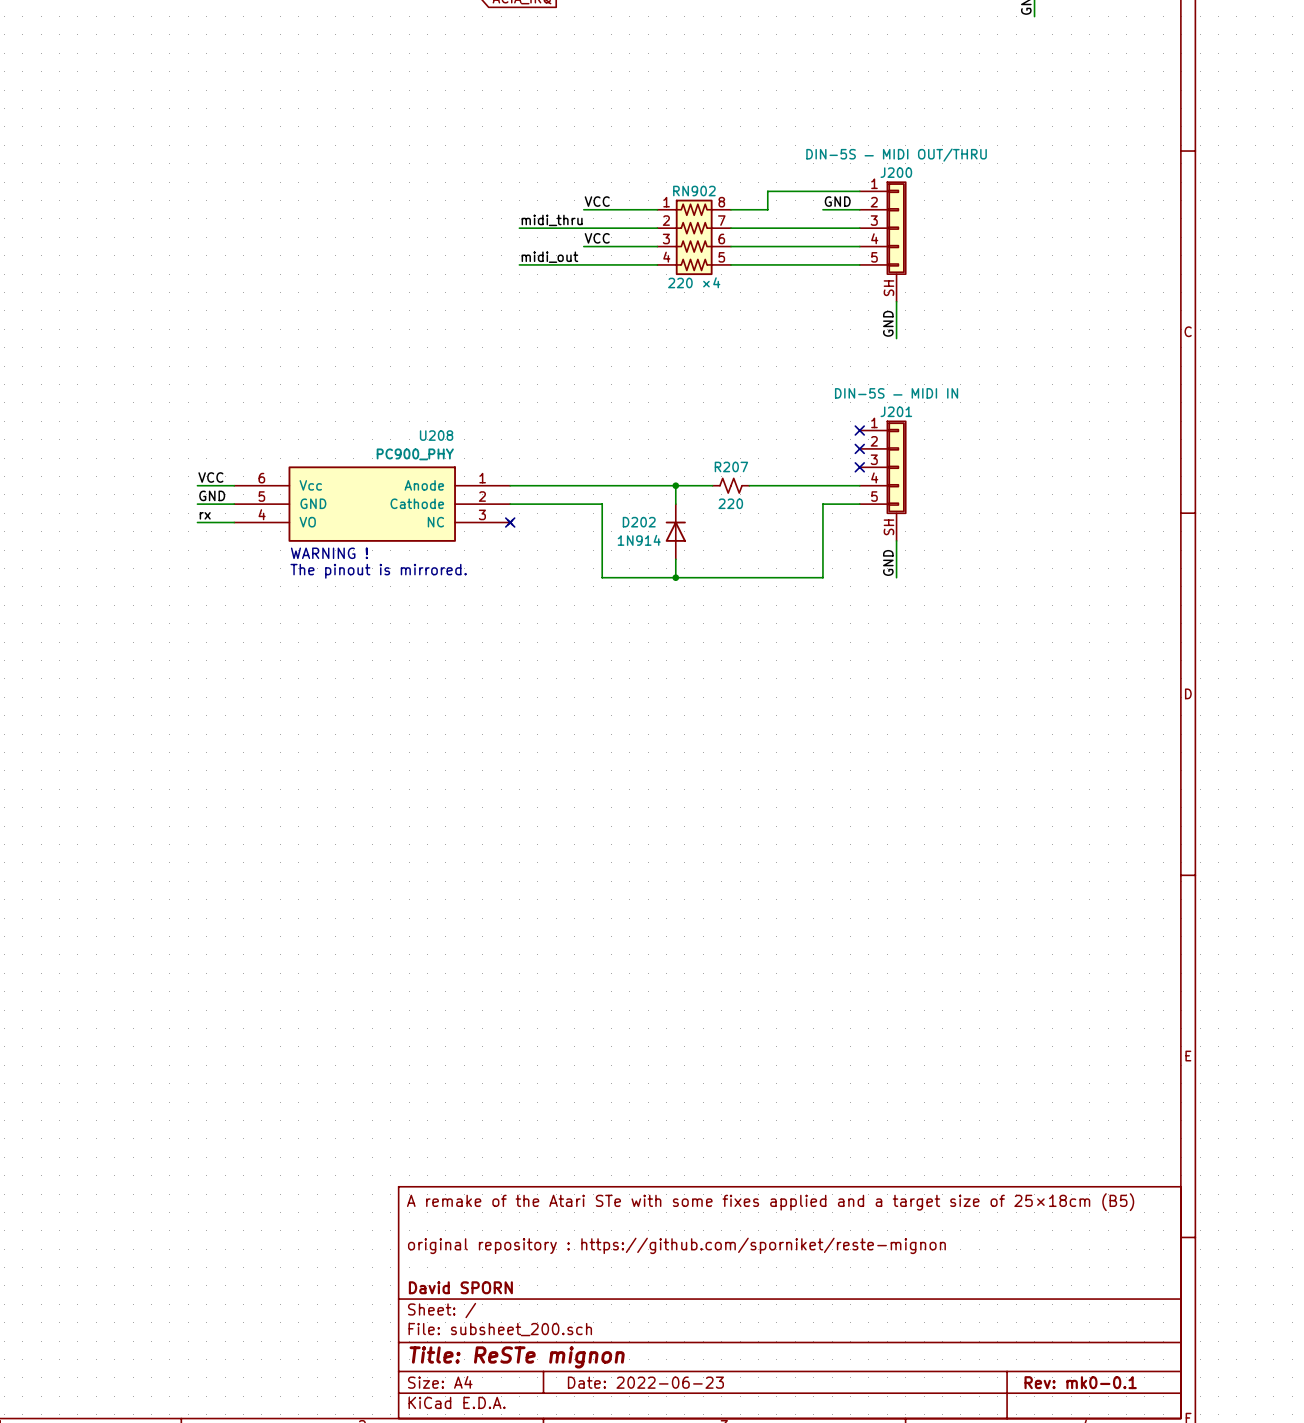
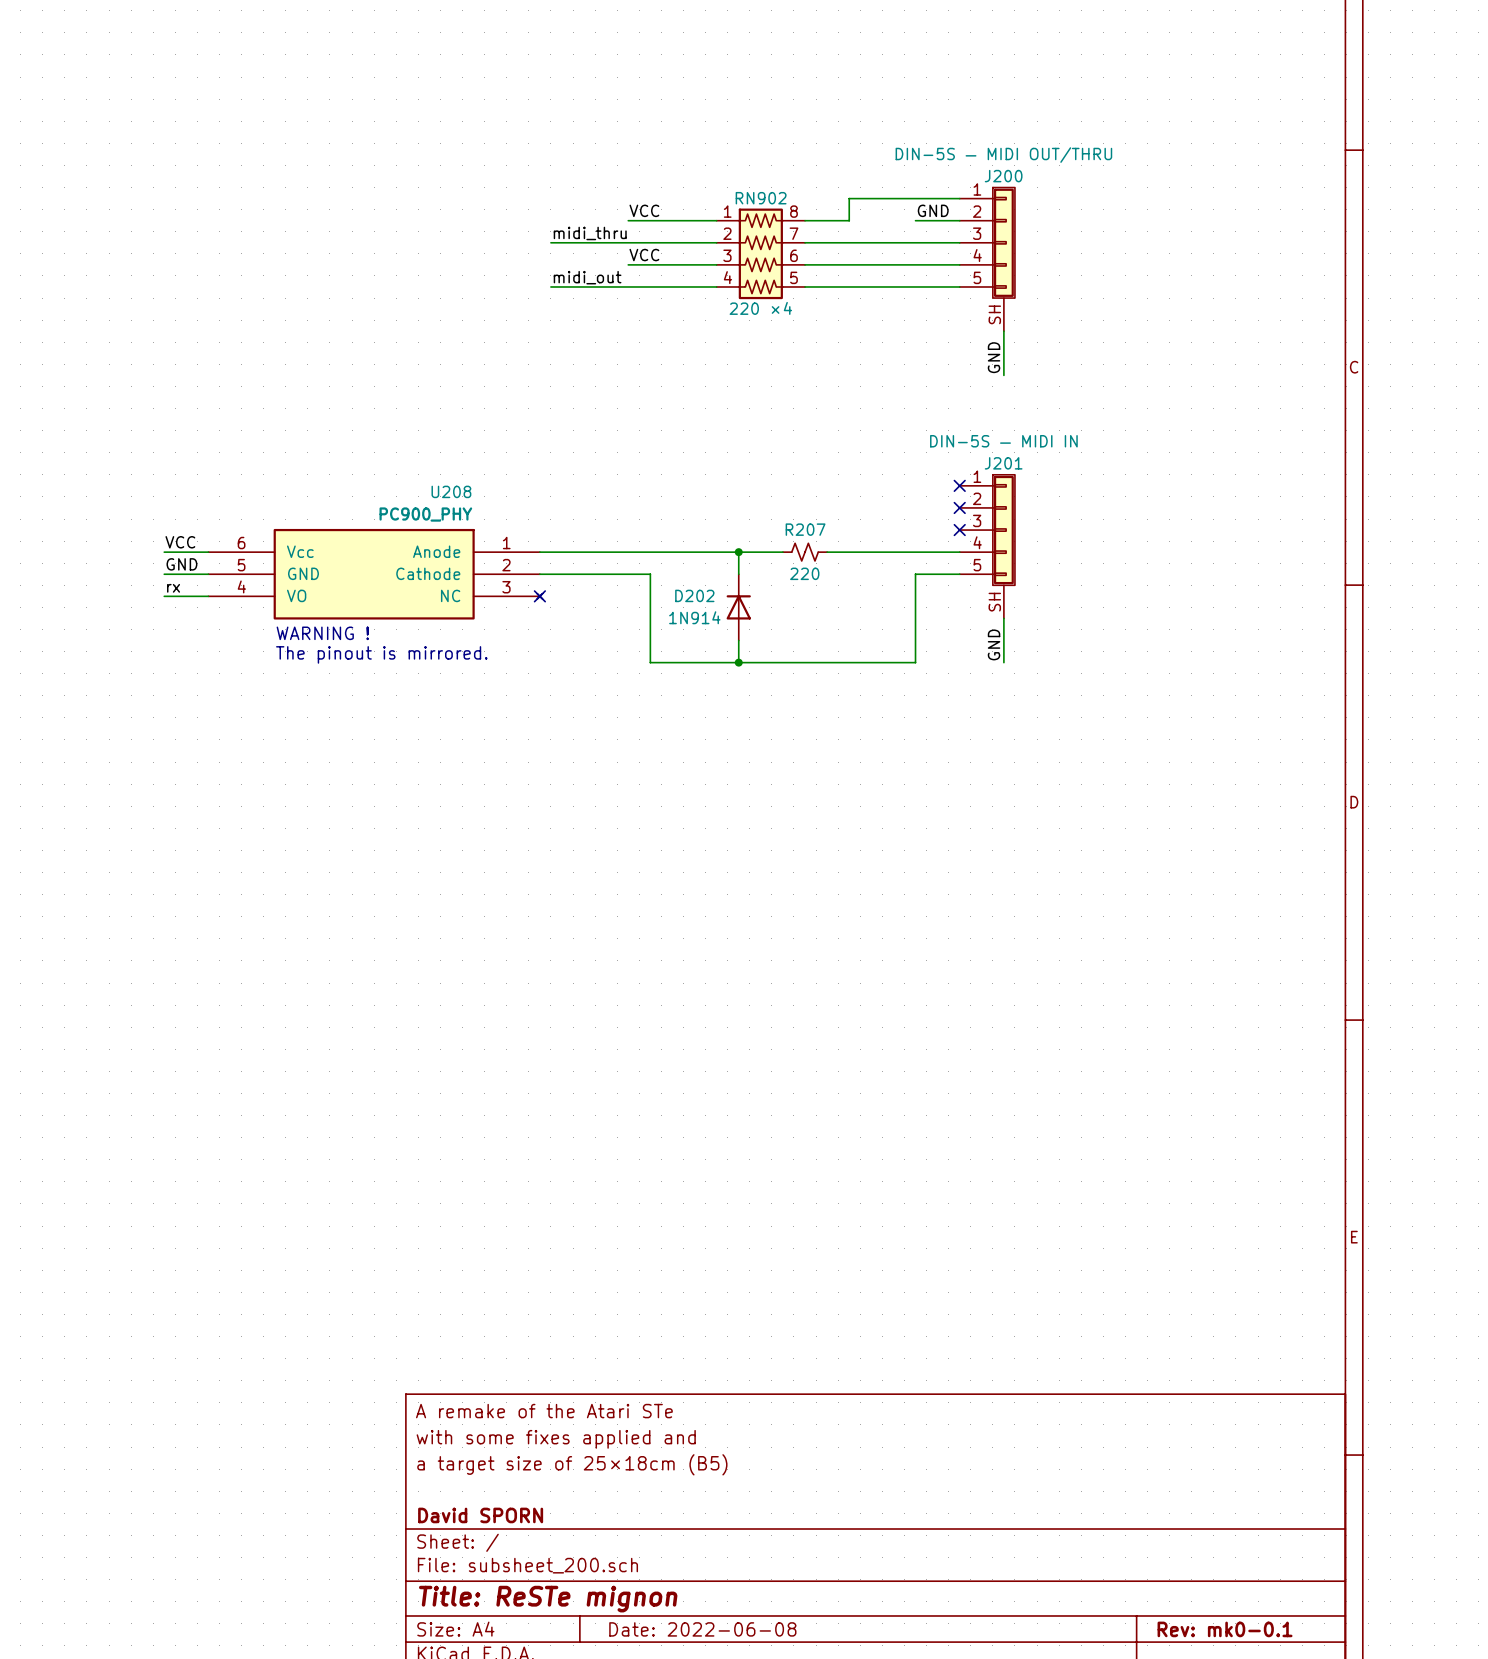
title block: A remake of the Atari STe with some fixes applied and a target size of 25×18cm (B5) (770, 1202) -> A remake of the Atari STe (544, 1411)
title block: none -> with some fixes applied and (556, 1439)
title block: original repository : https://github.com/sporniket/reste-mignon (676, 1245) -> a target size of 25×18cm (B5) (572, 1464)
title block: Date: 2022-06-23 (645, 1382) -> Date: 2022-06-08 (702, 1629)

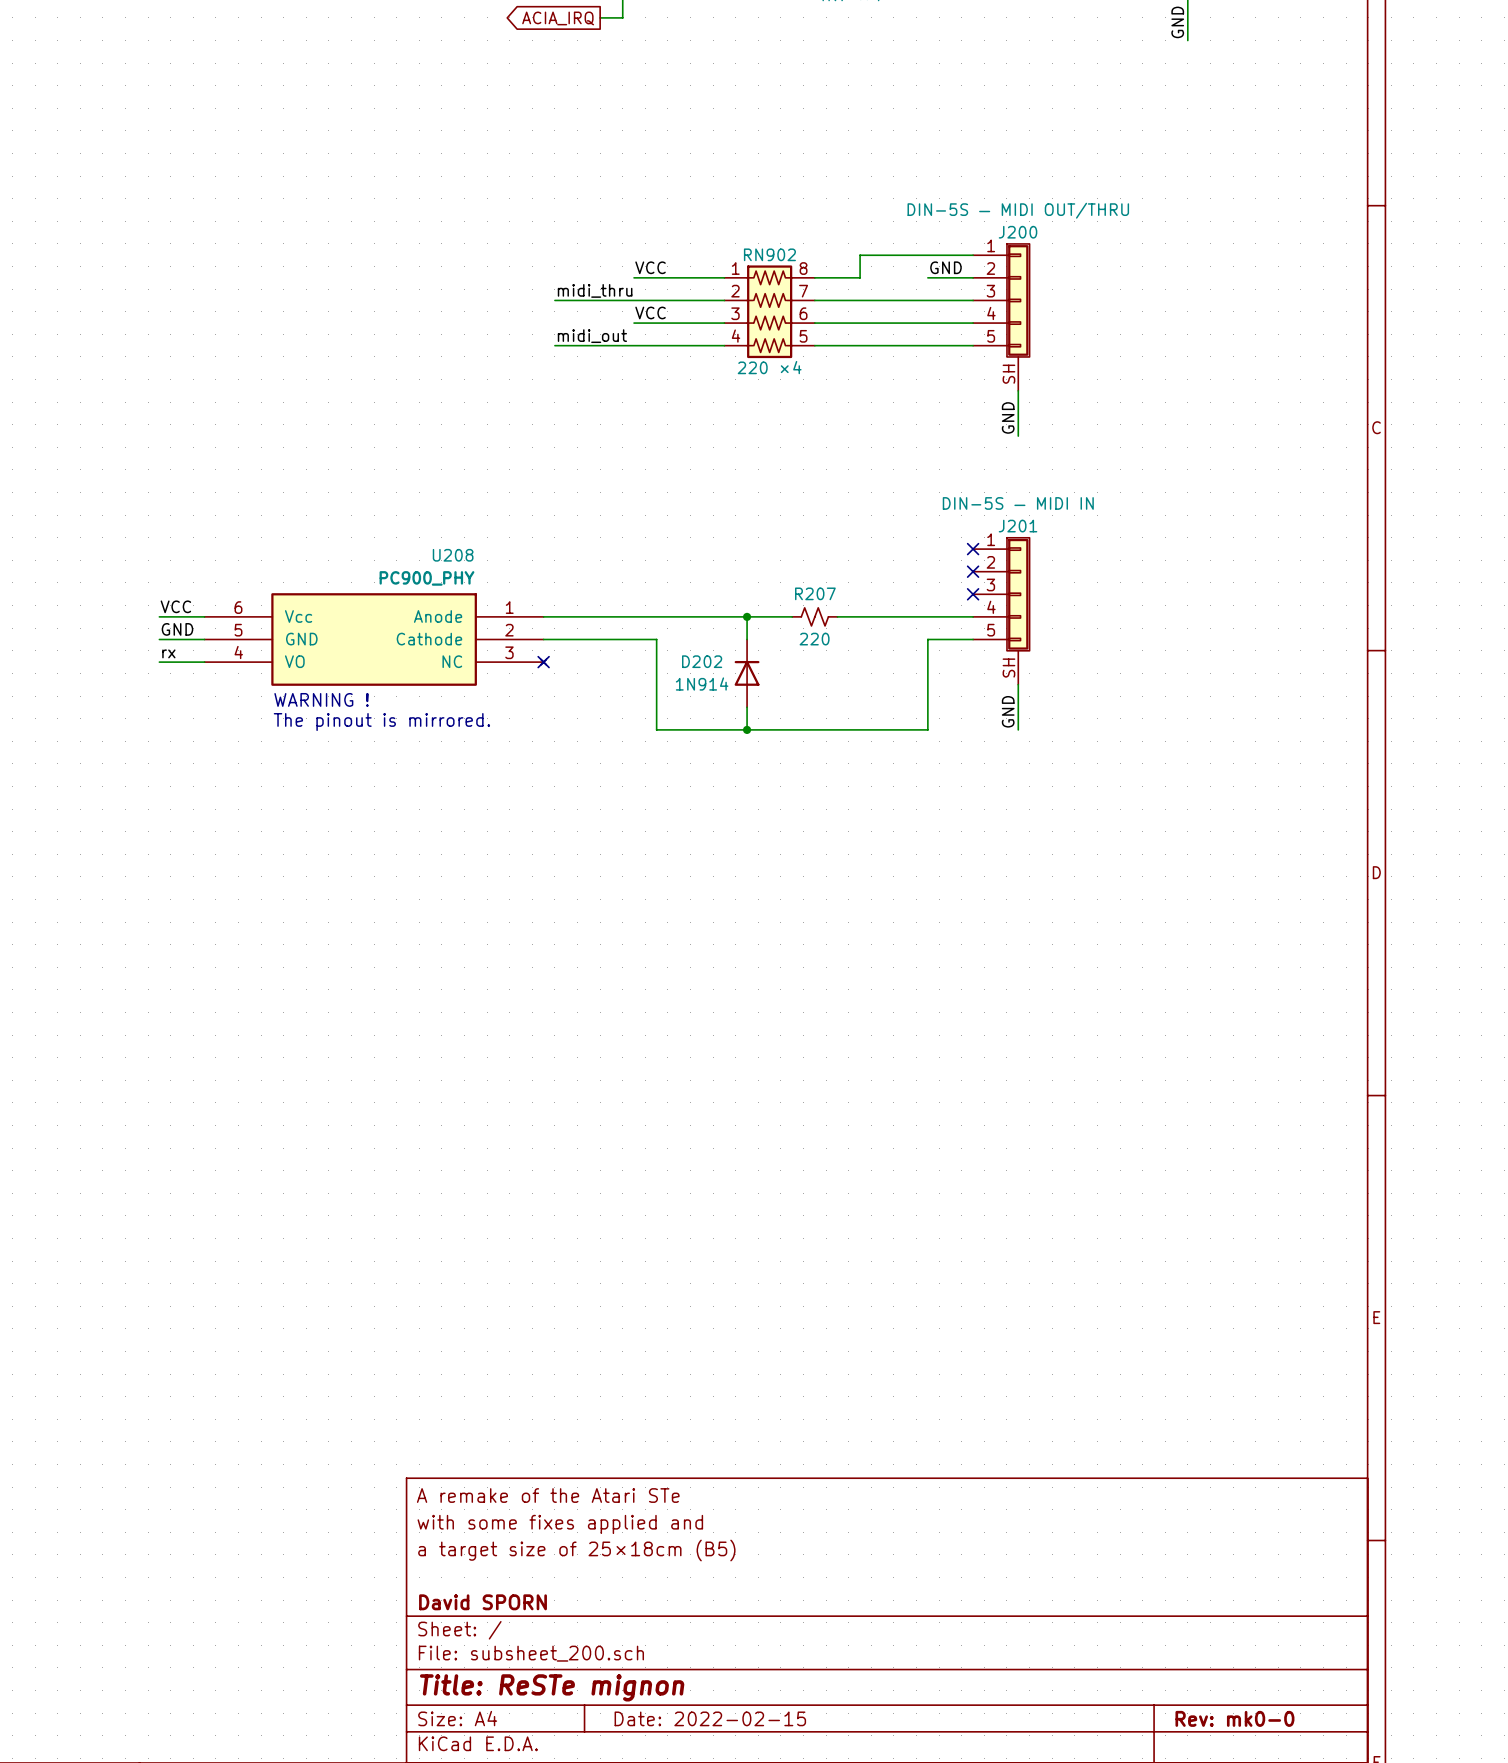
title block: Date: 2022-06-08 (702, 1629) -> Date: 2022-02-15 (710, 1718)
title block: Rev: mk0-0.1 (1225, 1629) -> Rev: mk0-0 (1234, 1718)

